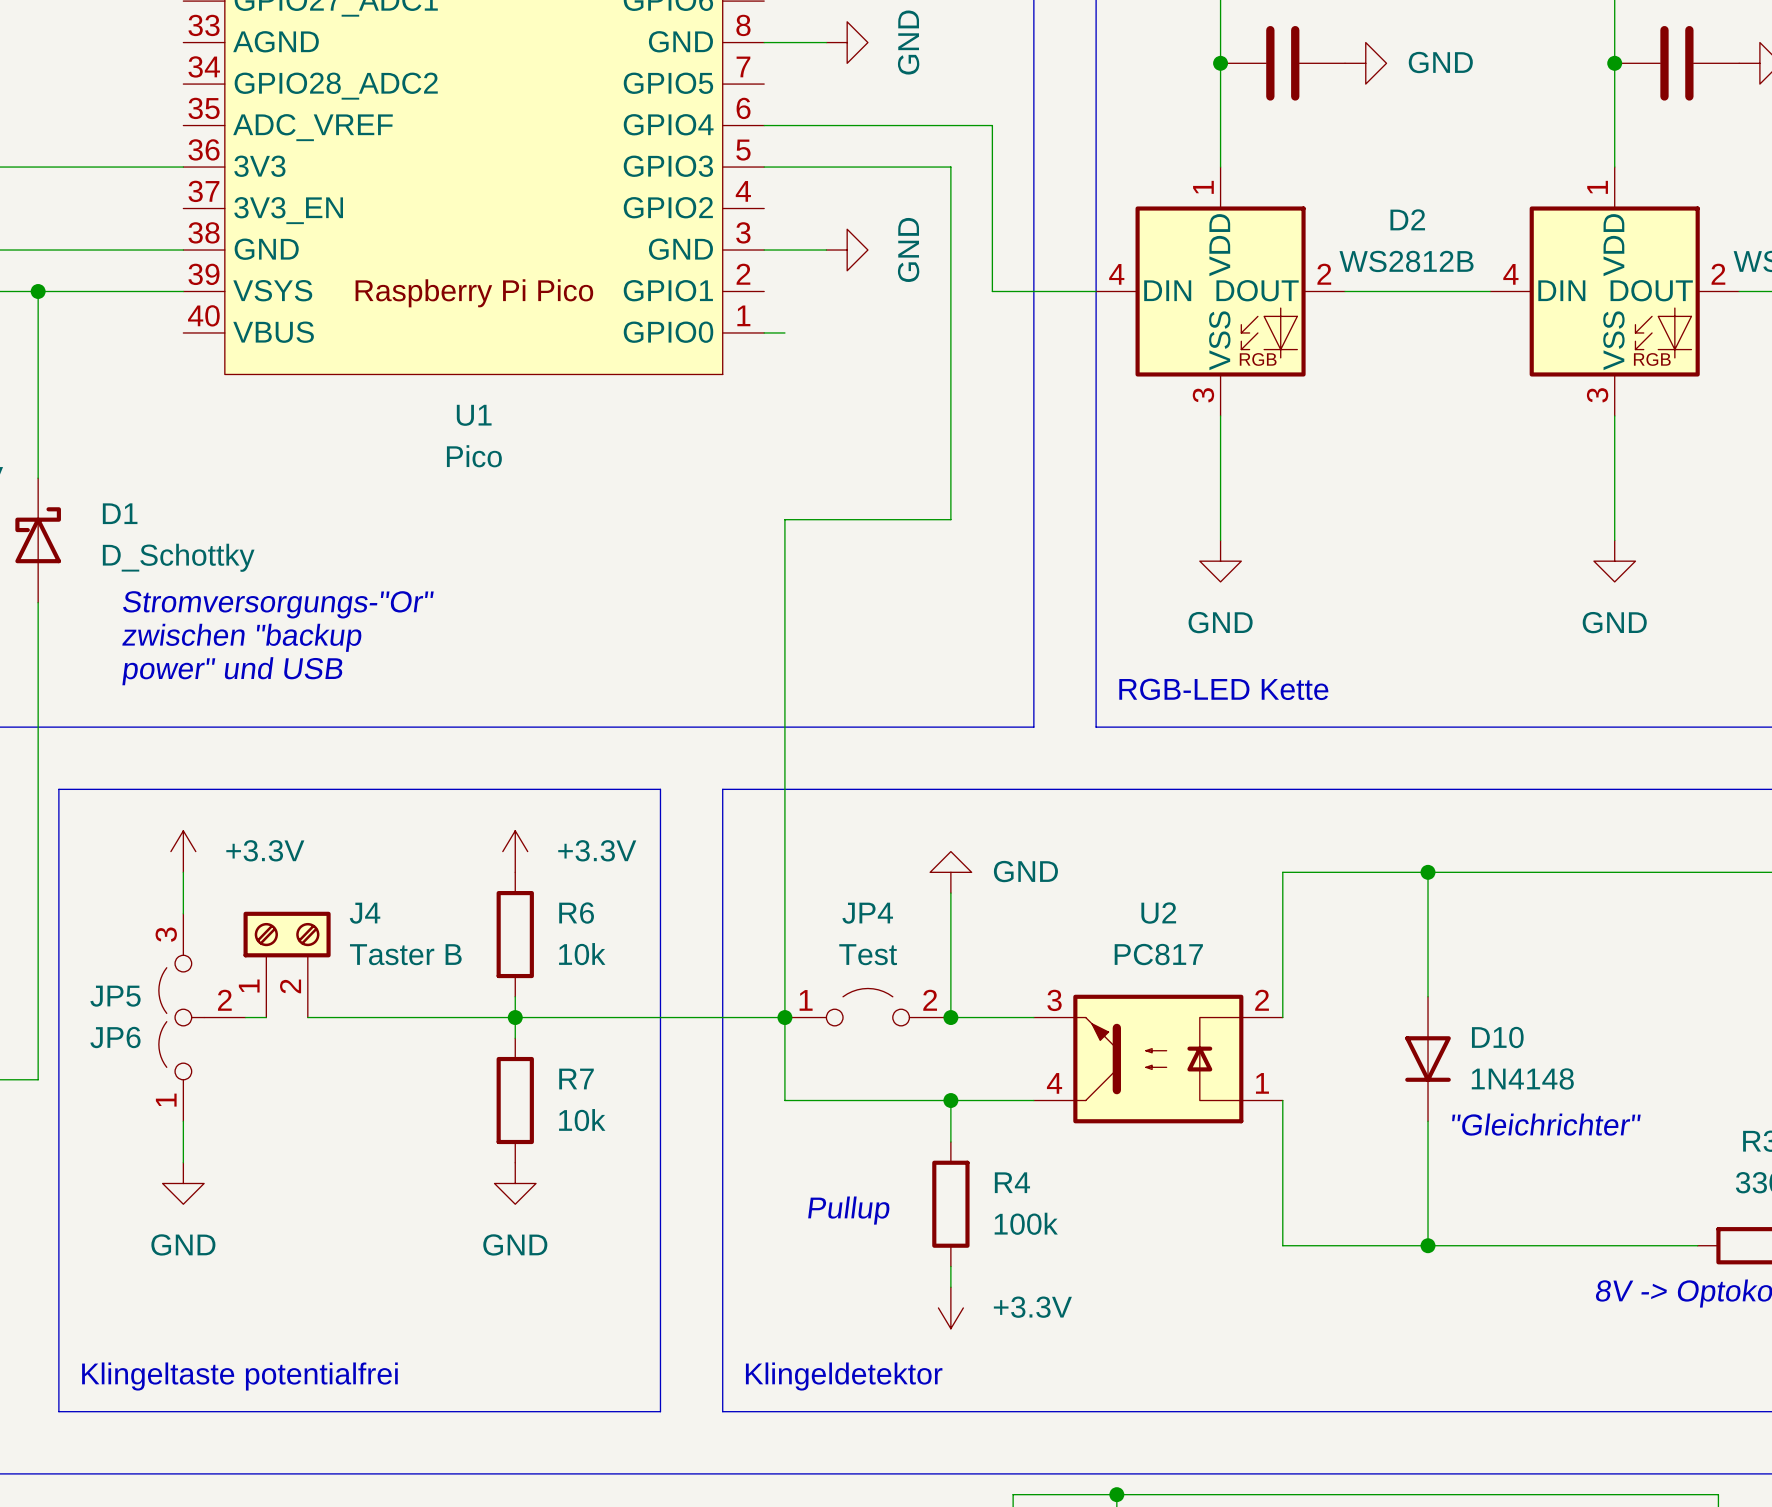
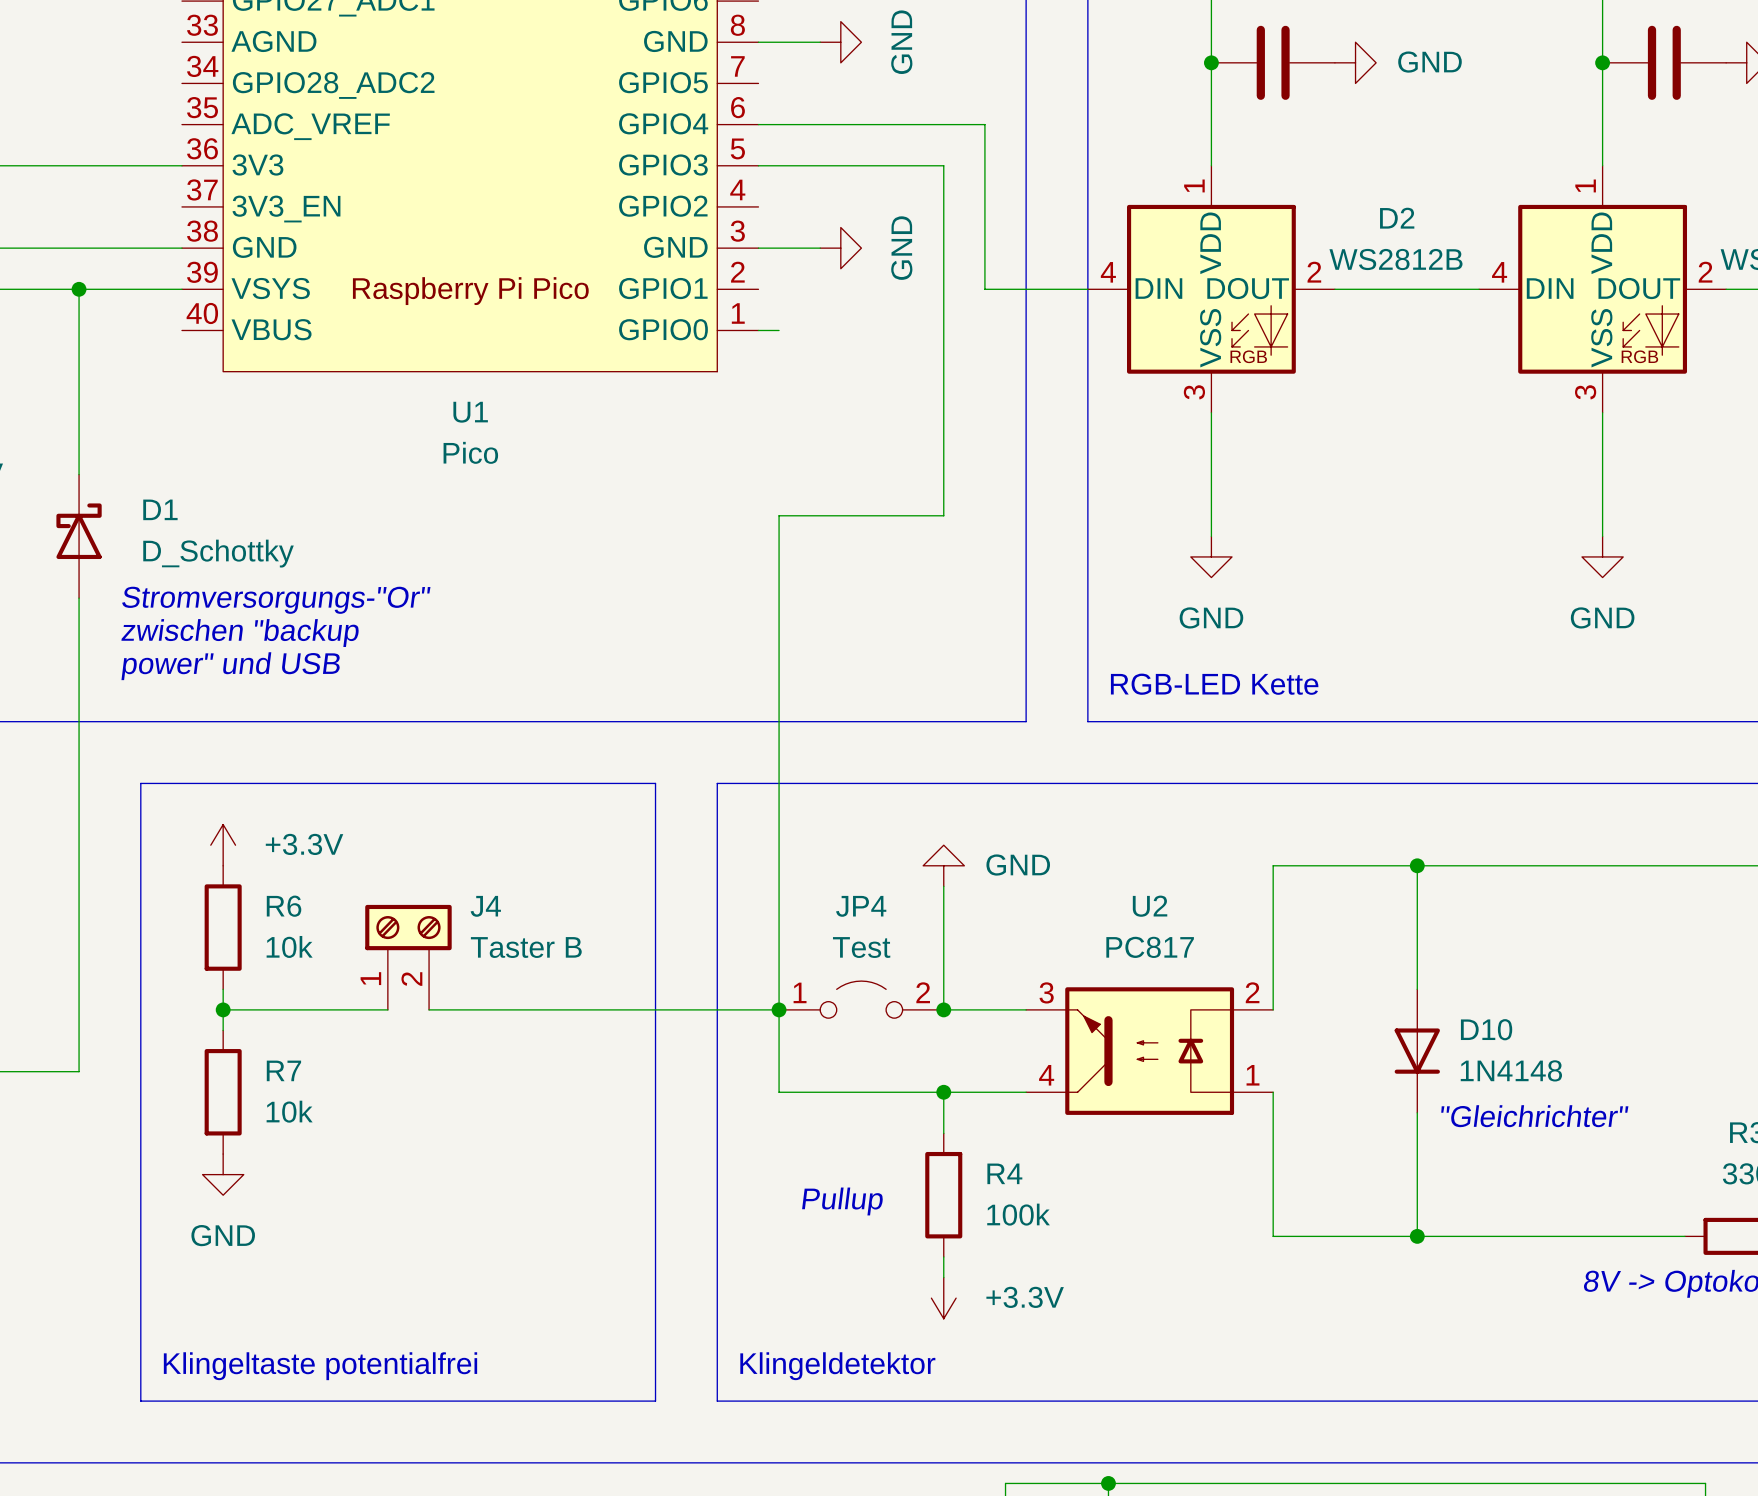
wire: (38, 291) (38, 478) -> (79, 289) (79, 474)
junction position: (38, 291) -> (79, 289)
D1 position: (38, 540) -> (79, 536)
wire: (38, 602) (38, 1079) -> (79, 598) (79, 1071) (37, 1071)
line: (141, 789) (58, 789) (58, 1411) (141, 1411) -> (140, 783) (140, 1401)
power symbol position: +3.3V (183, 851) -> +3.3V (223, 845)
power symbol: +3.3V (515, 851) -> none
wire: (183, 872) (183, 913) -> none
R6 position: (515, 934) -> (223, 927)
J4 position: (287, 964) -> (408, 957)
wire: (515, 996) (515, 1038) -> none
JP5: JP6 (202, 1017) -> none
junction: none -> (223, 1009)
wire: (390, 1017) (432, 1017) -> (264, 1009) (305, 1009)
junction: (515, 1017) -> none
R7 position: (515, 1100) -> (223, 1092)
wire: (183, 1121) (183, 1162) -> (223, 989) (223, 1030)
power symbol position: GND (183, 1183) -> GND (223, 1174)
power symbol: GND (515, 1183) -> none
text position: Klingeltaste potentialfrei (239, 1376) -> Klingeltaste potentialfrei (320, 1366)

